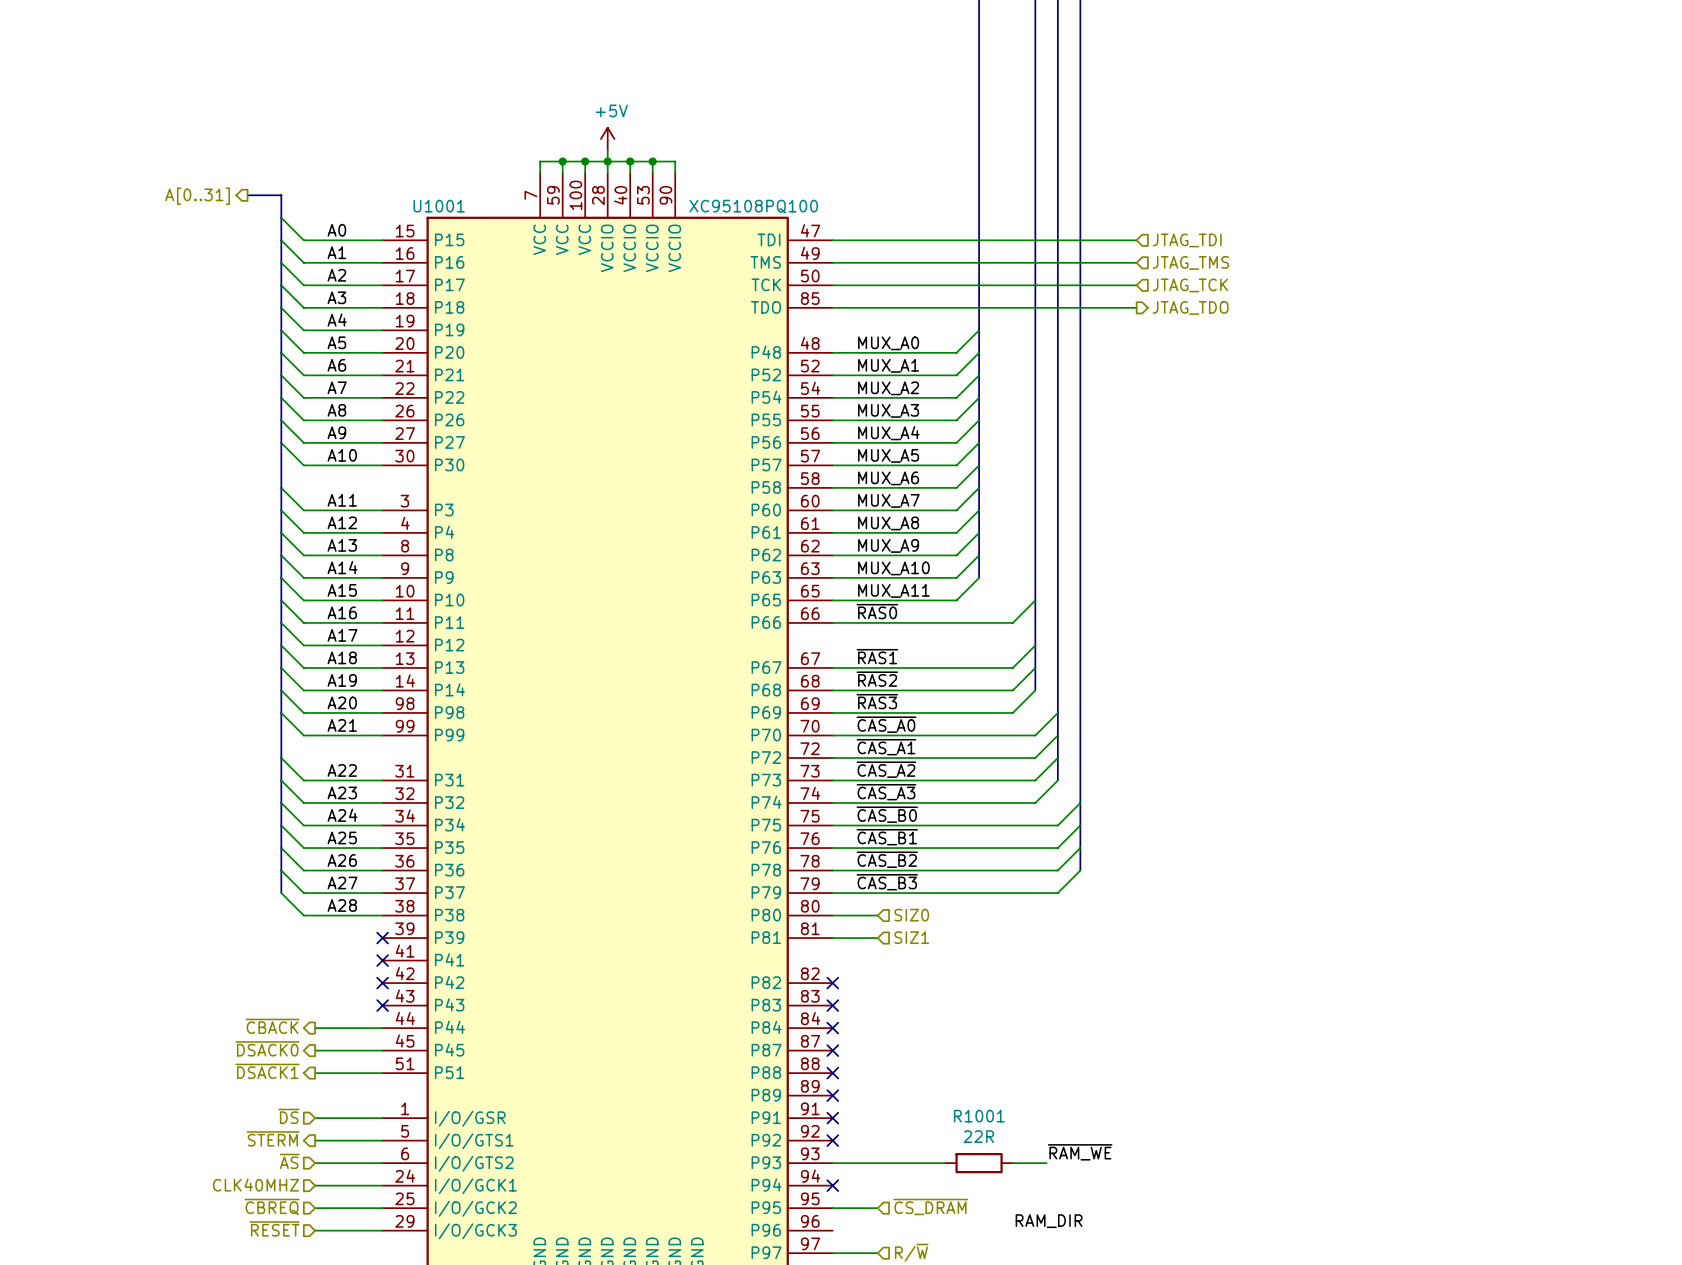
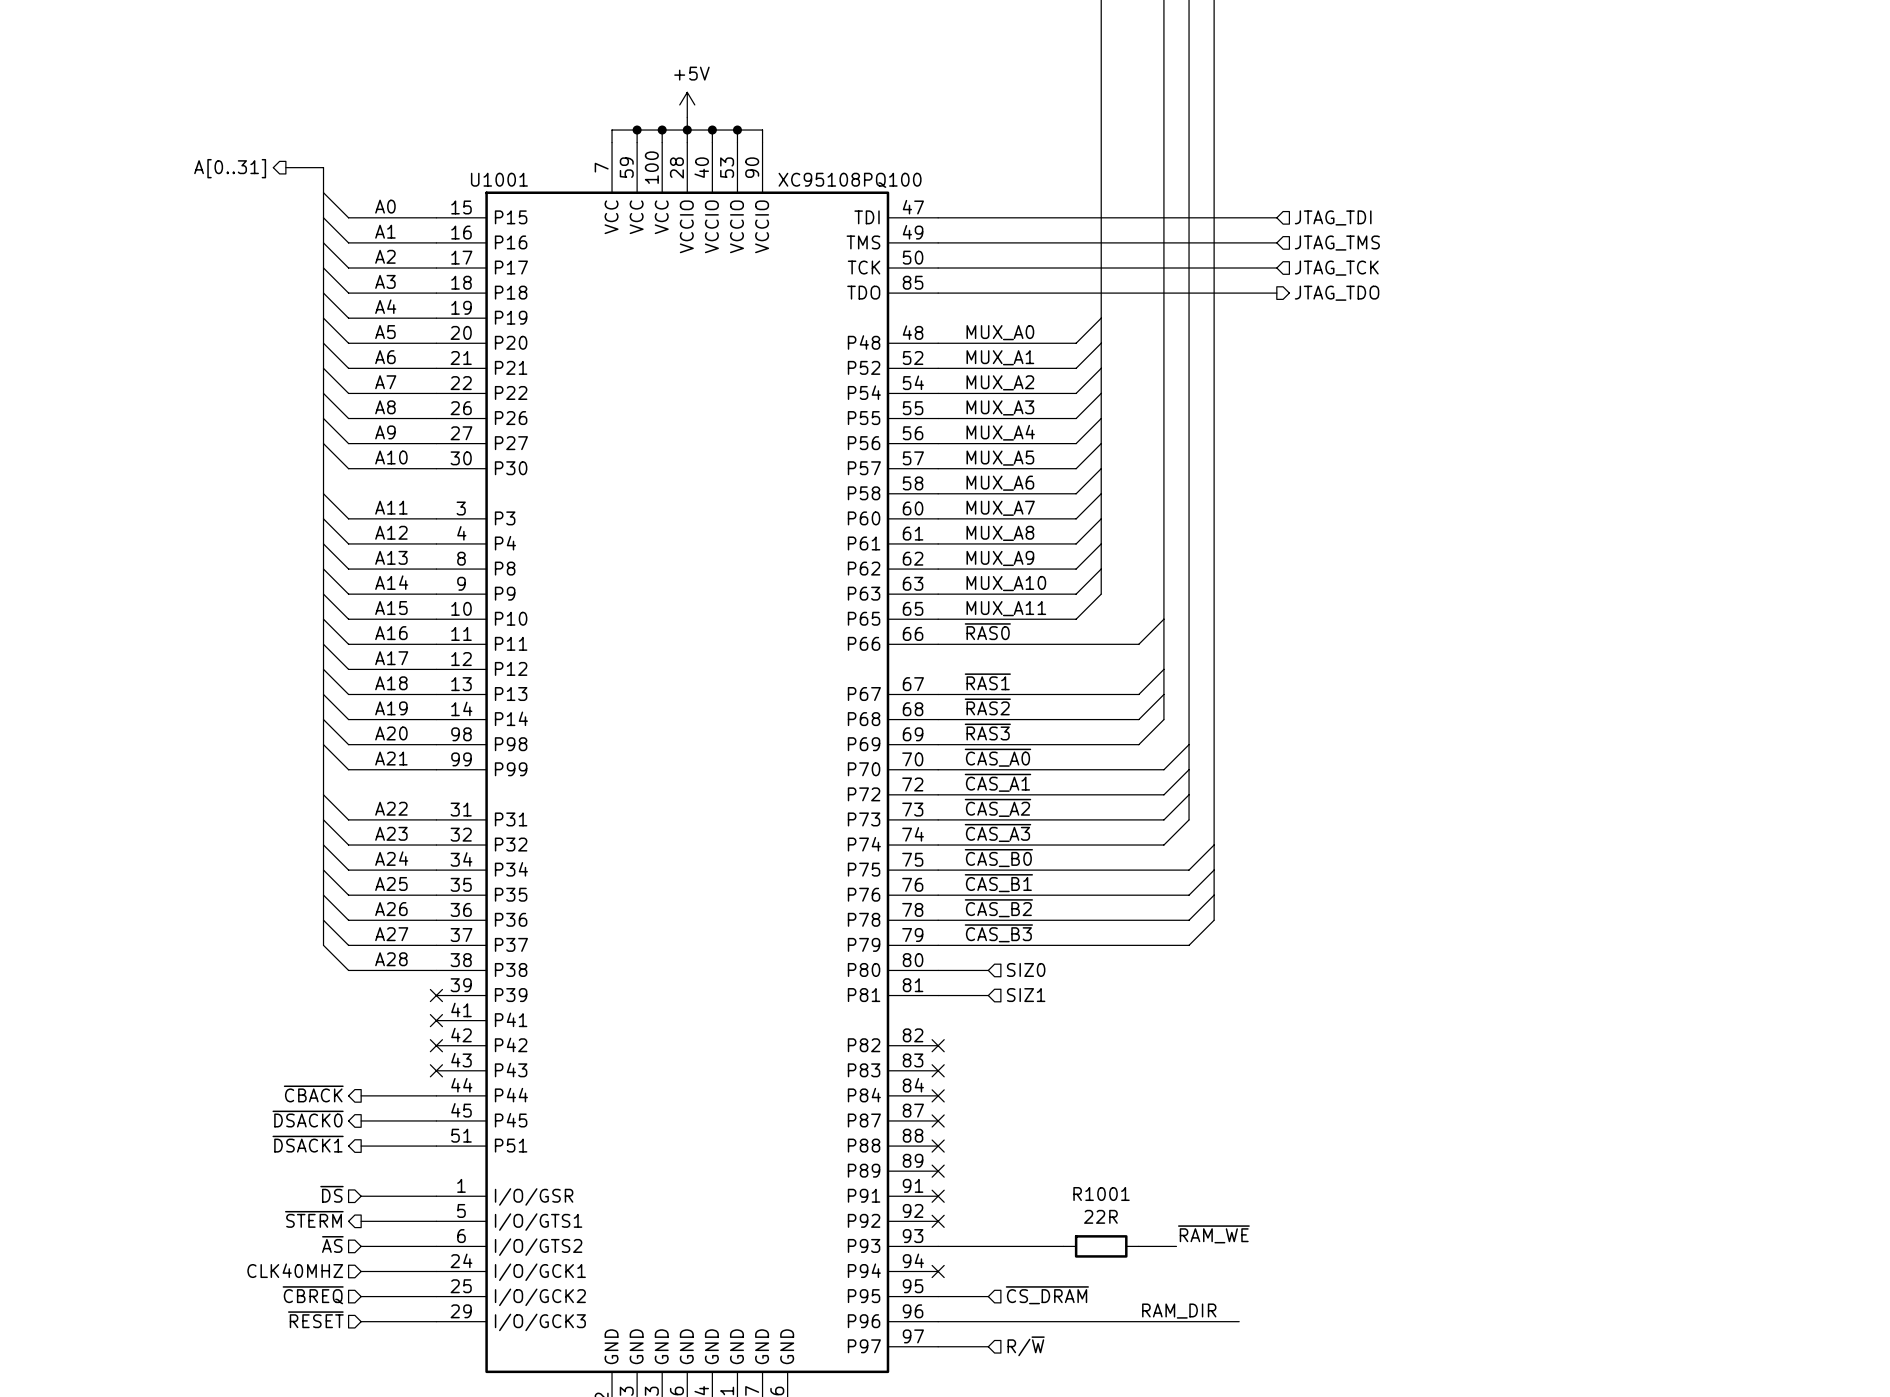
wire: none -> (938, 1321) (1239, 1321)

